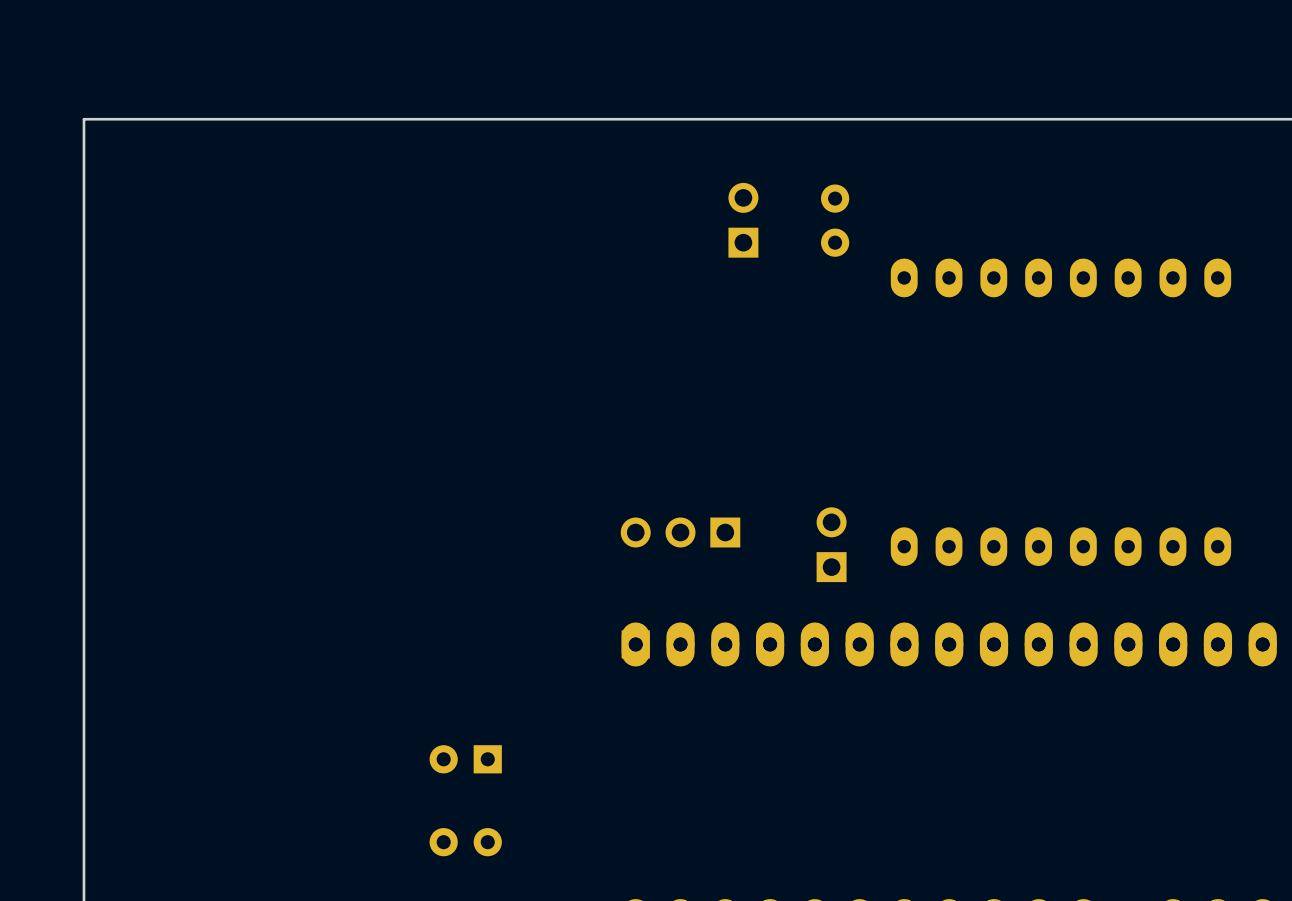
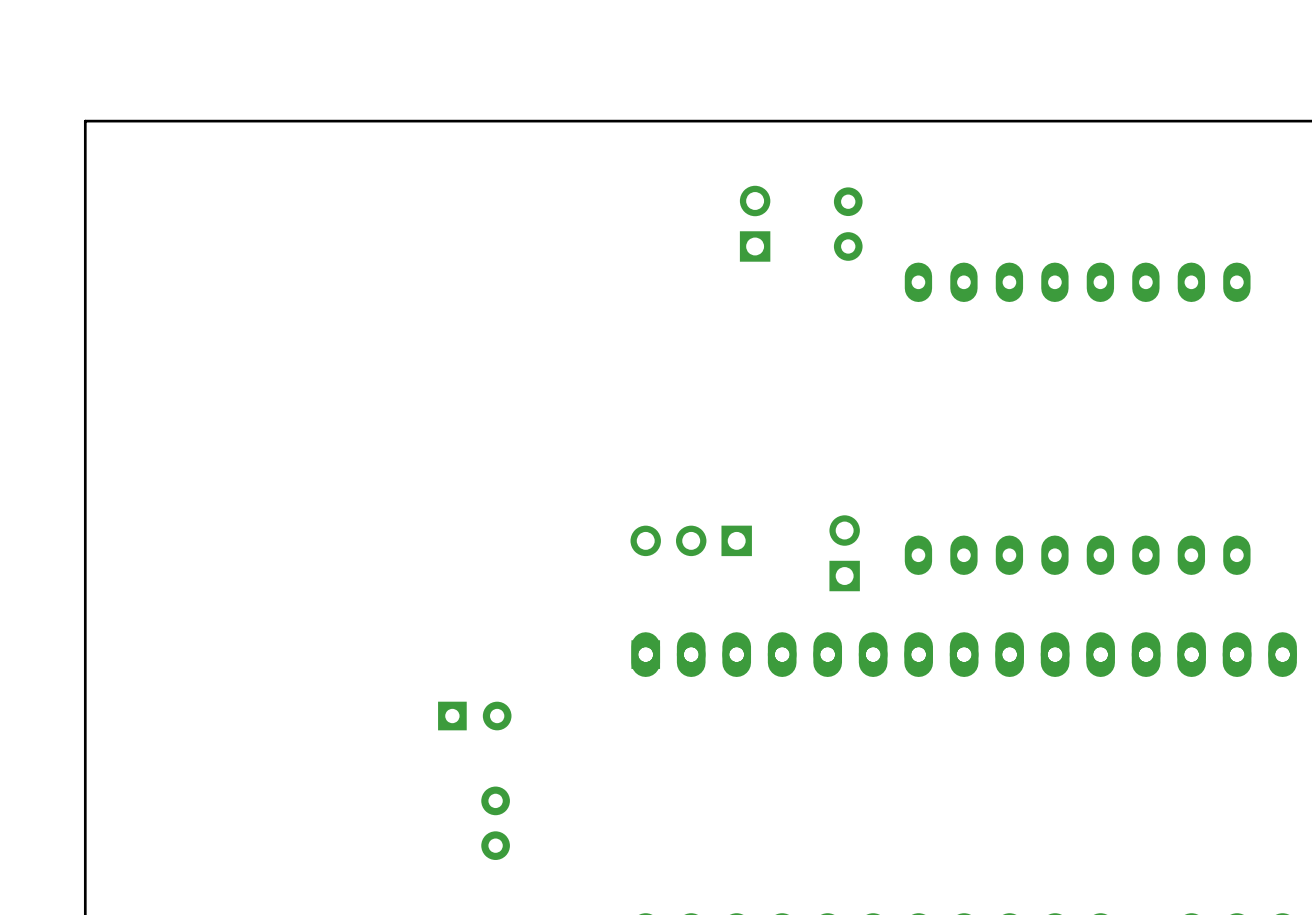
part rotation: 0° (465, 759) -> 180° (474, 716)
part position: (465, 759) -> (474, 716)
part rotation: 0° (465, 842) -> 90° clockwise (495, 823)

